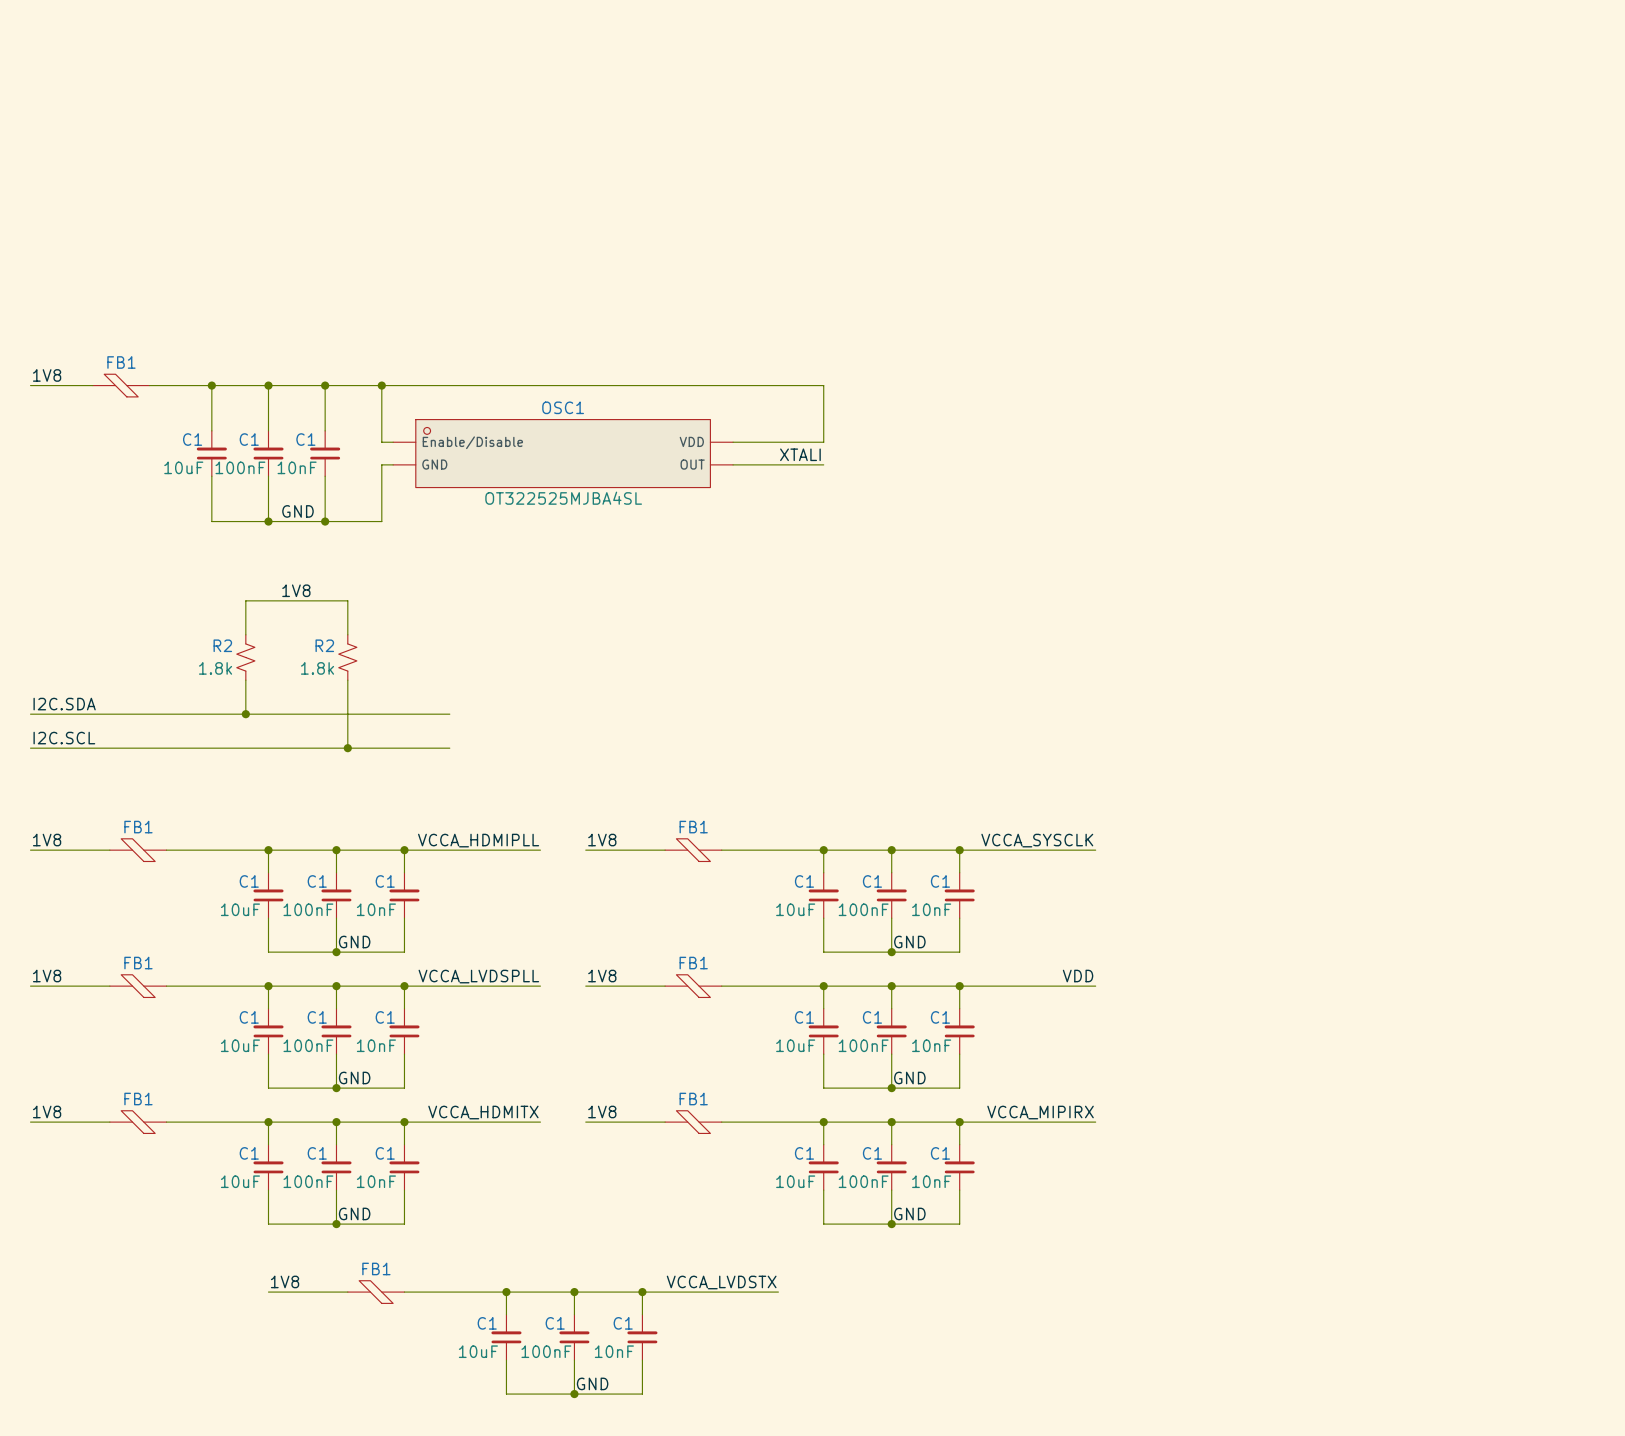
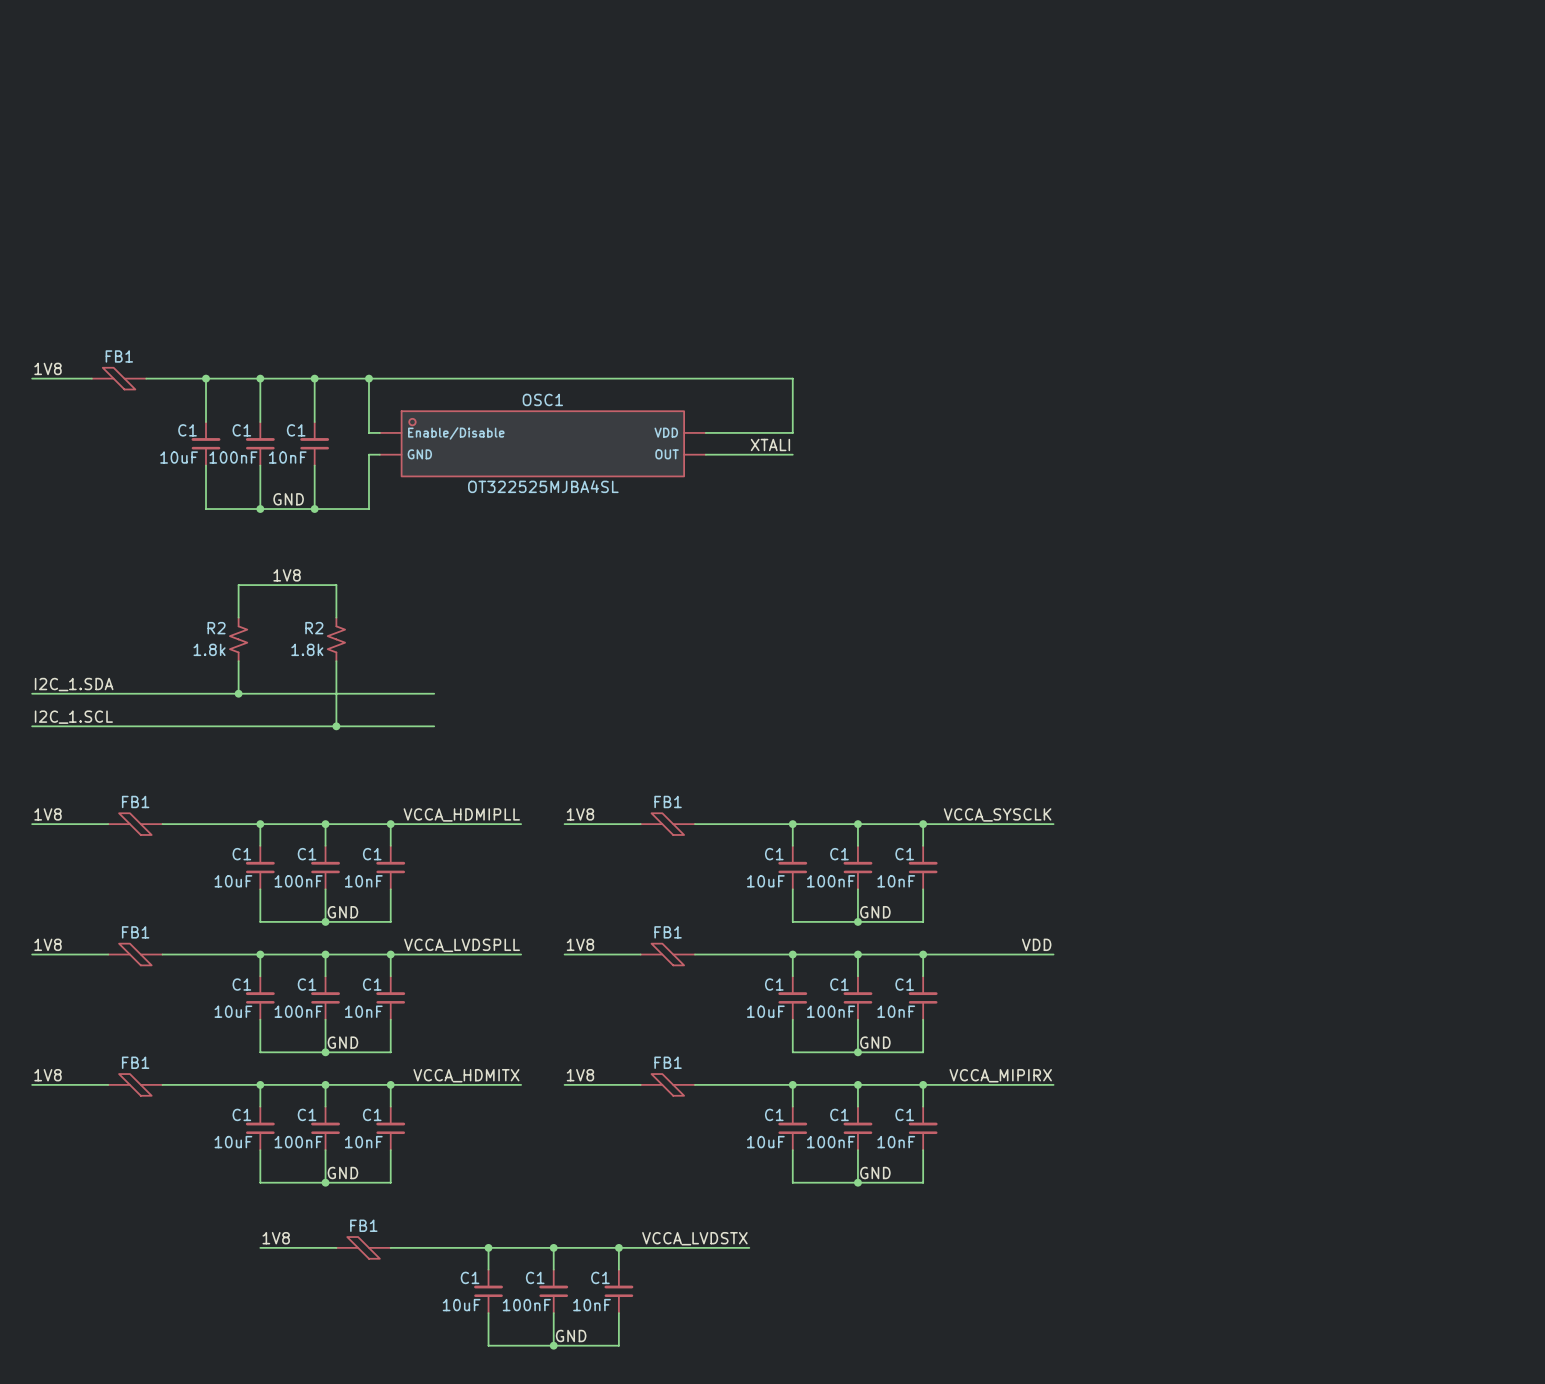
label: I2C.SDA (64, 704) -> I2C_1.SDA (74, 684)
label: I2C.SCL (64, 738) -> I2C_1.SCL (73, 717)

